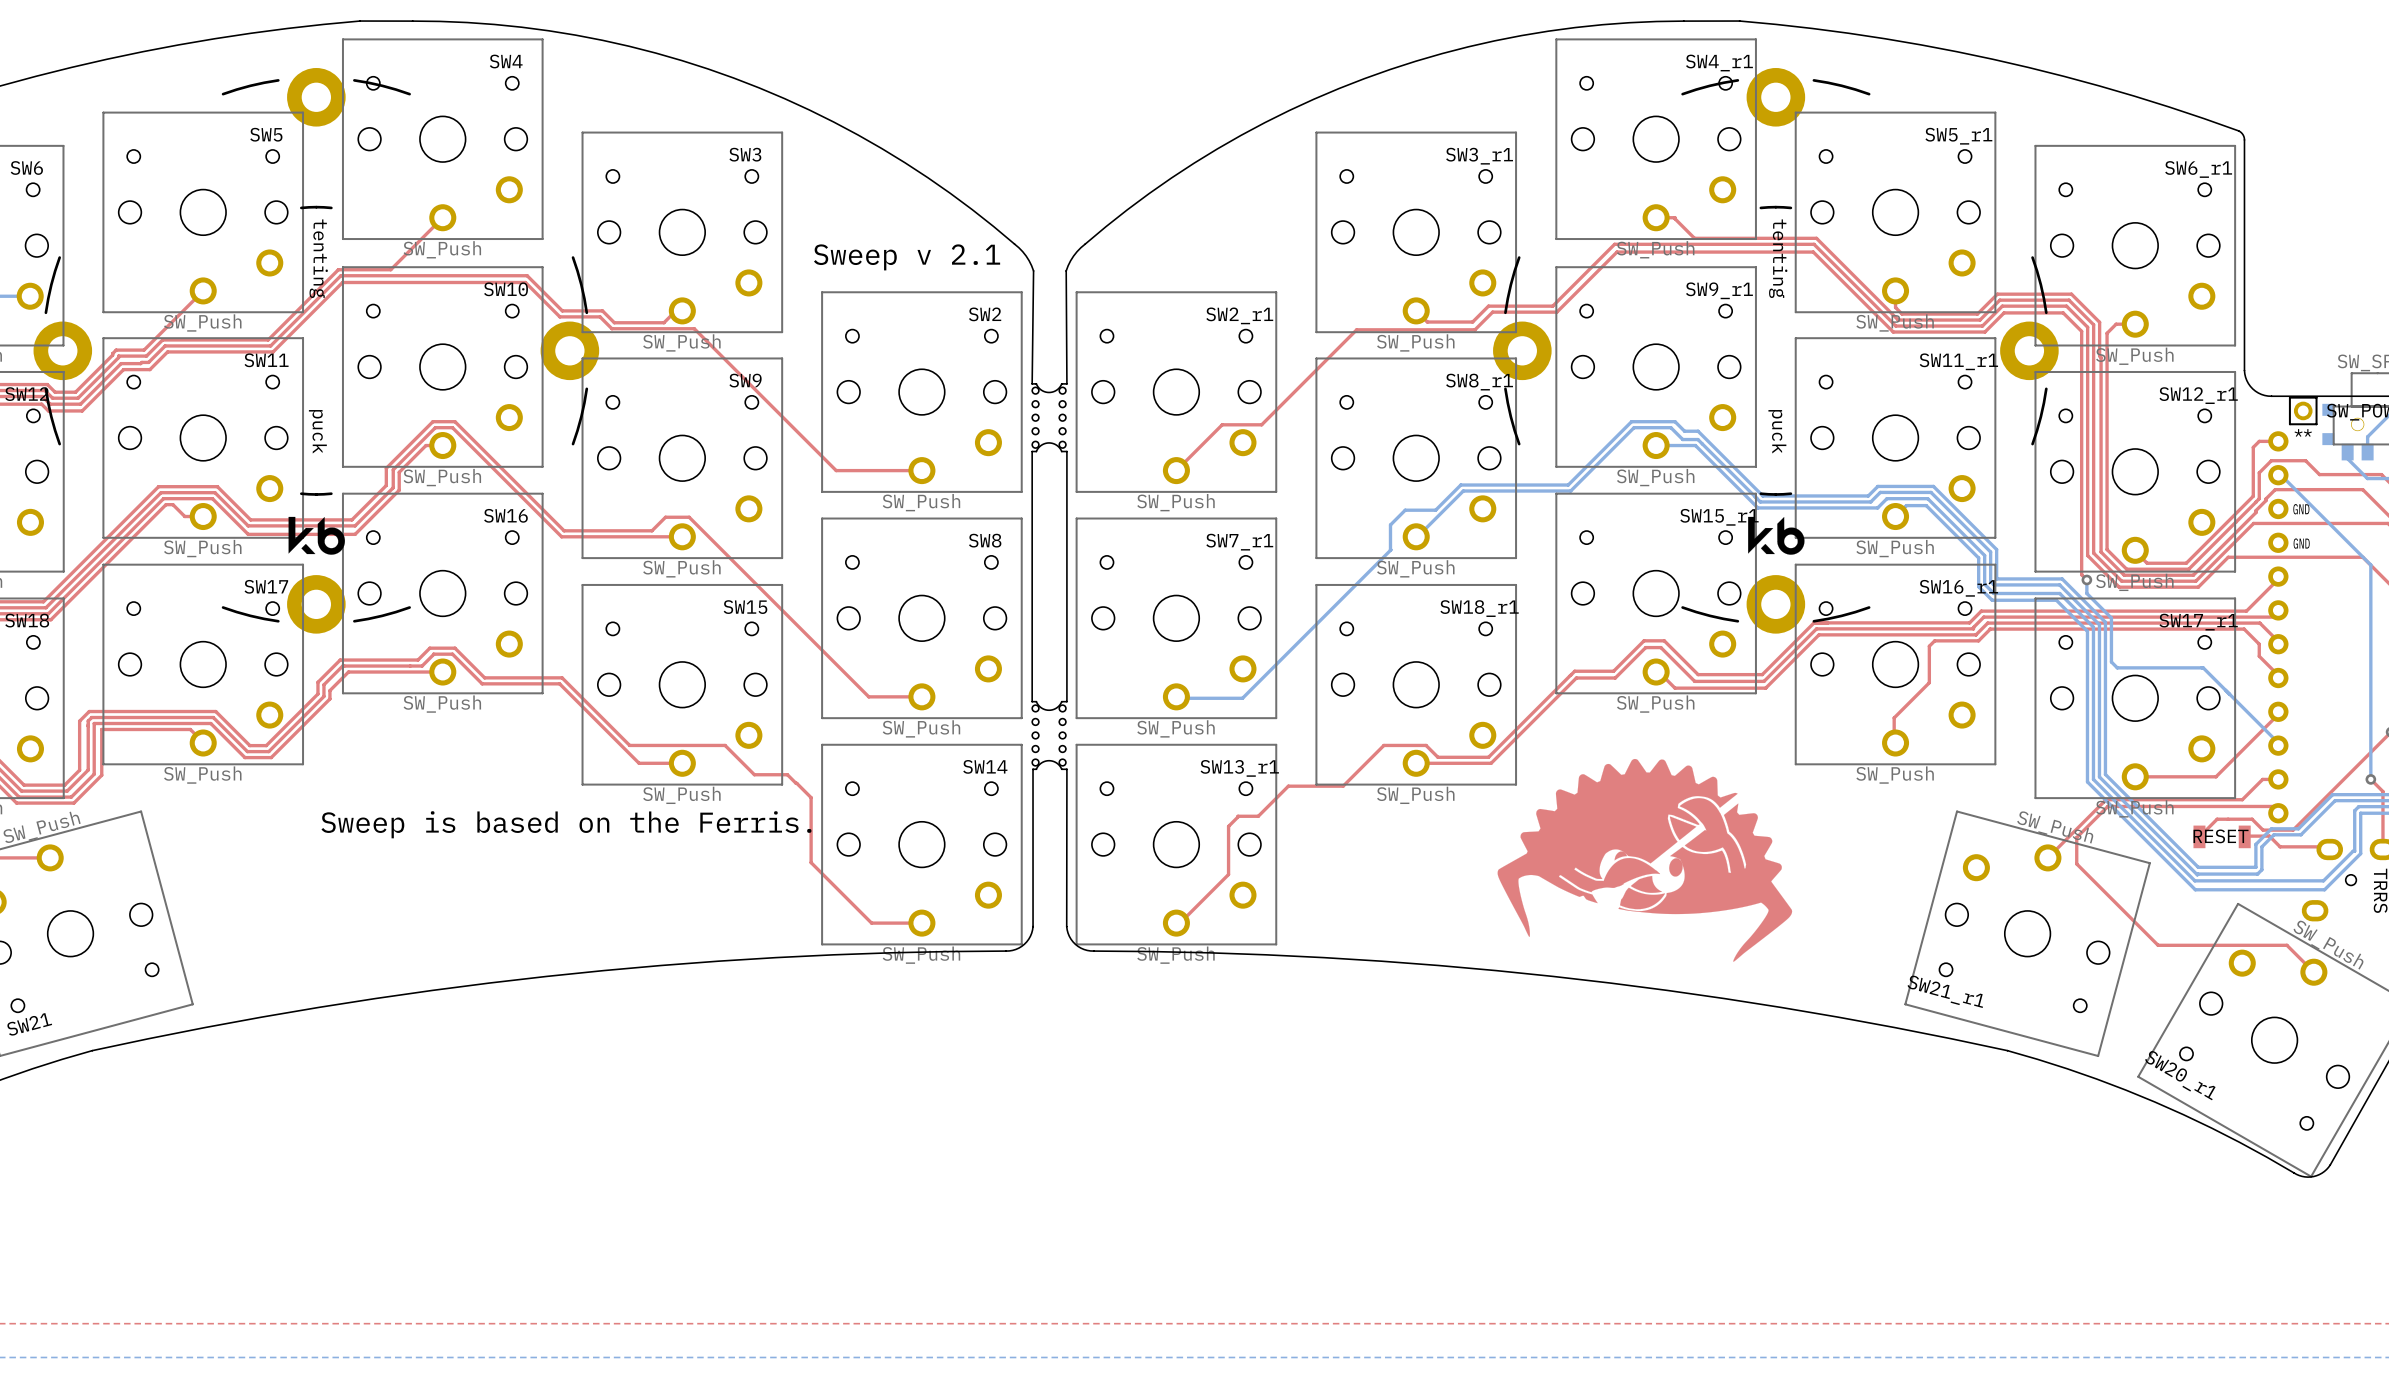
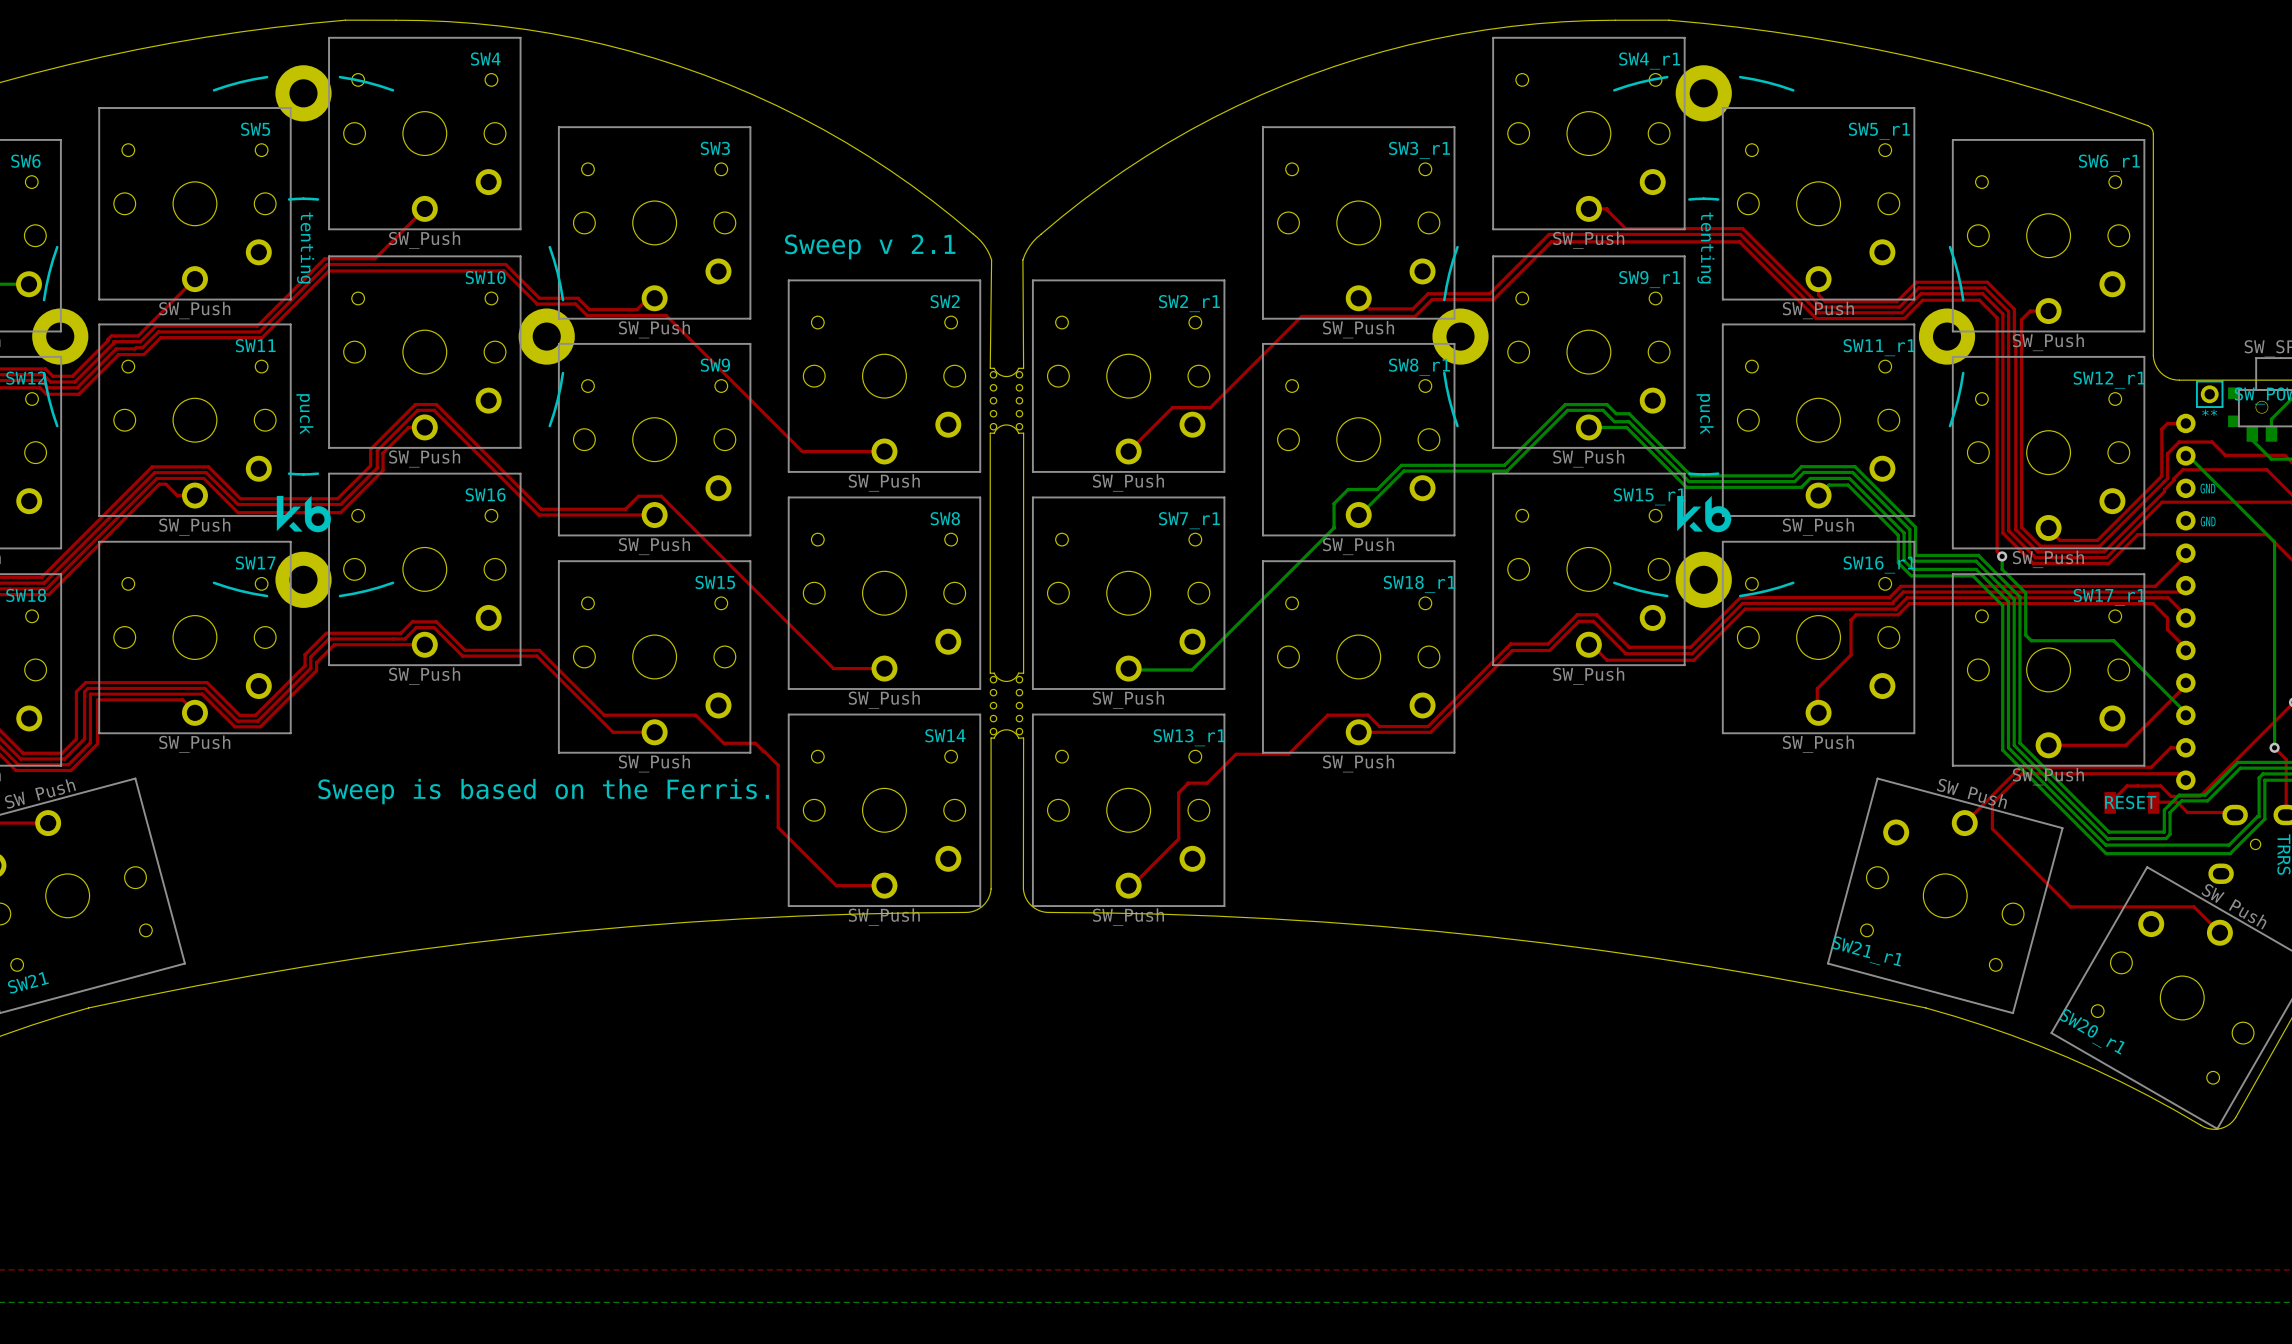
drawing: [1497, 758, 1793, 962] -> none

